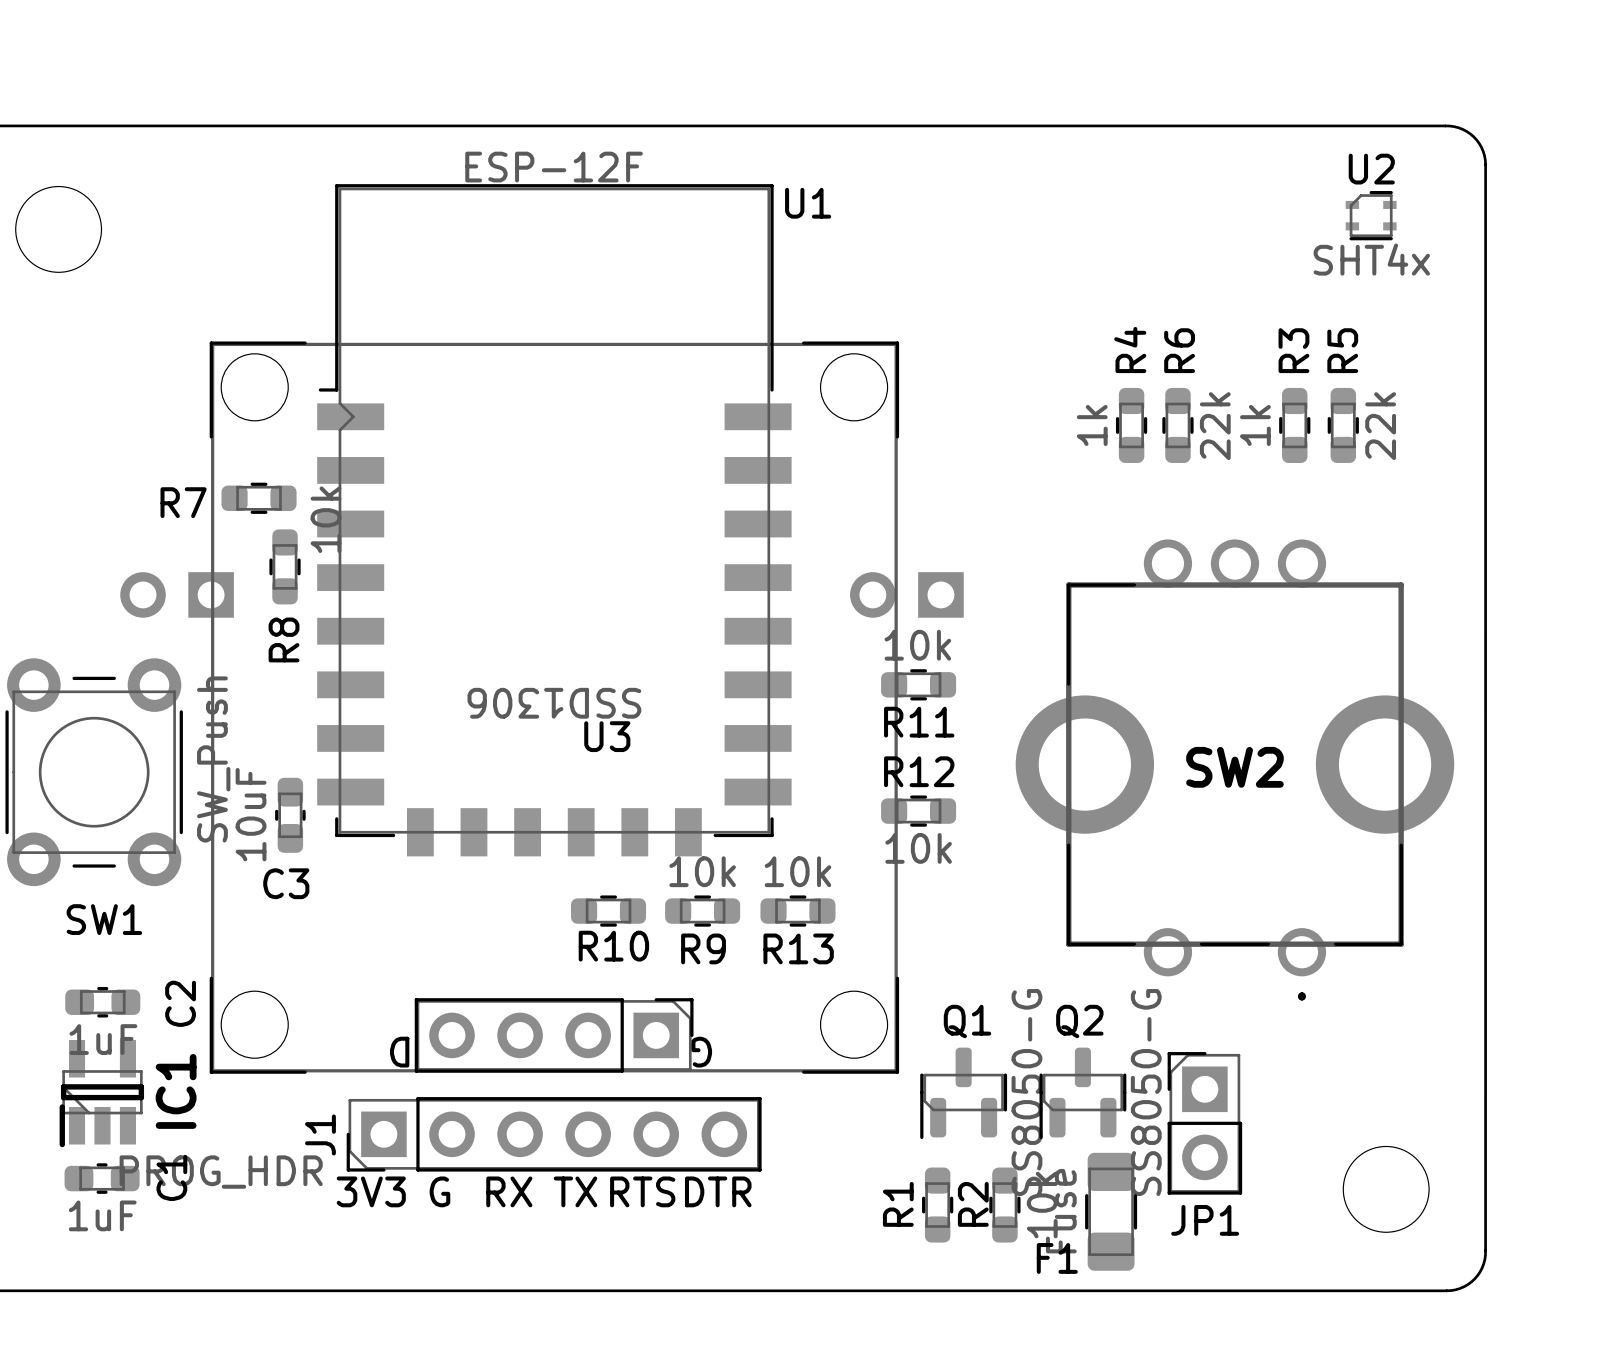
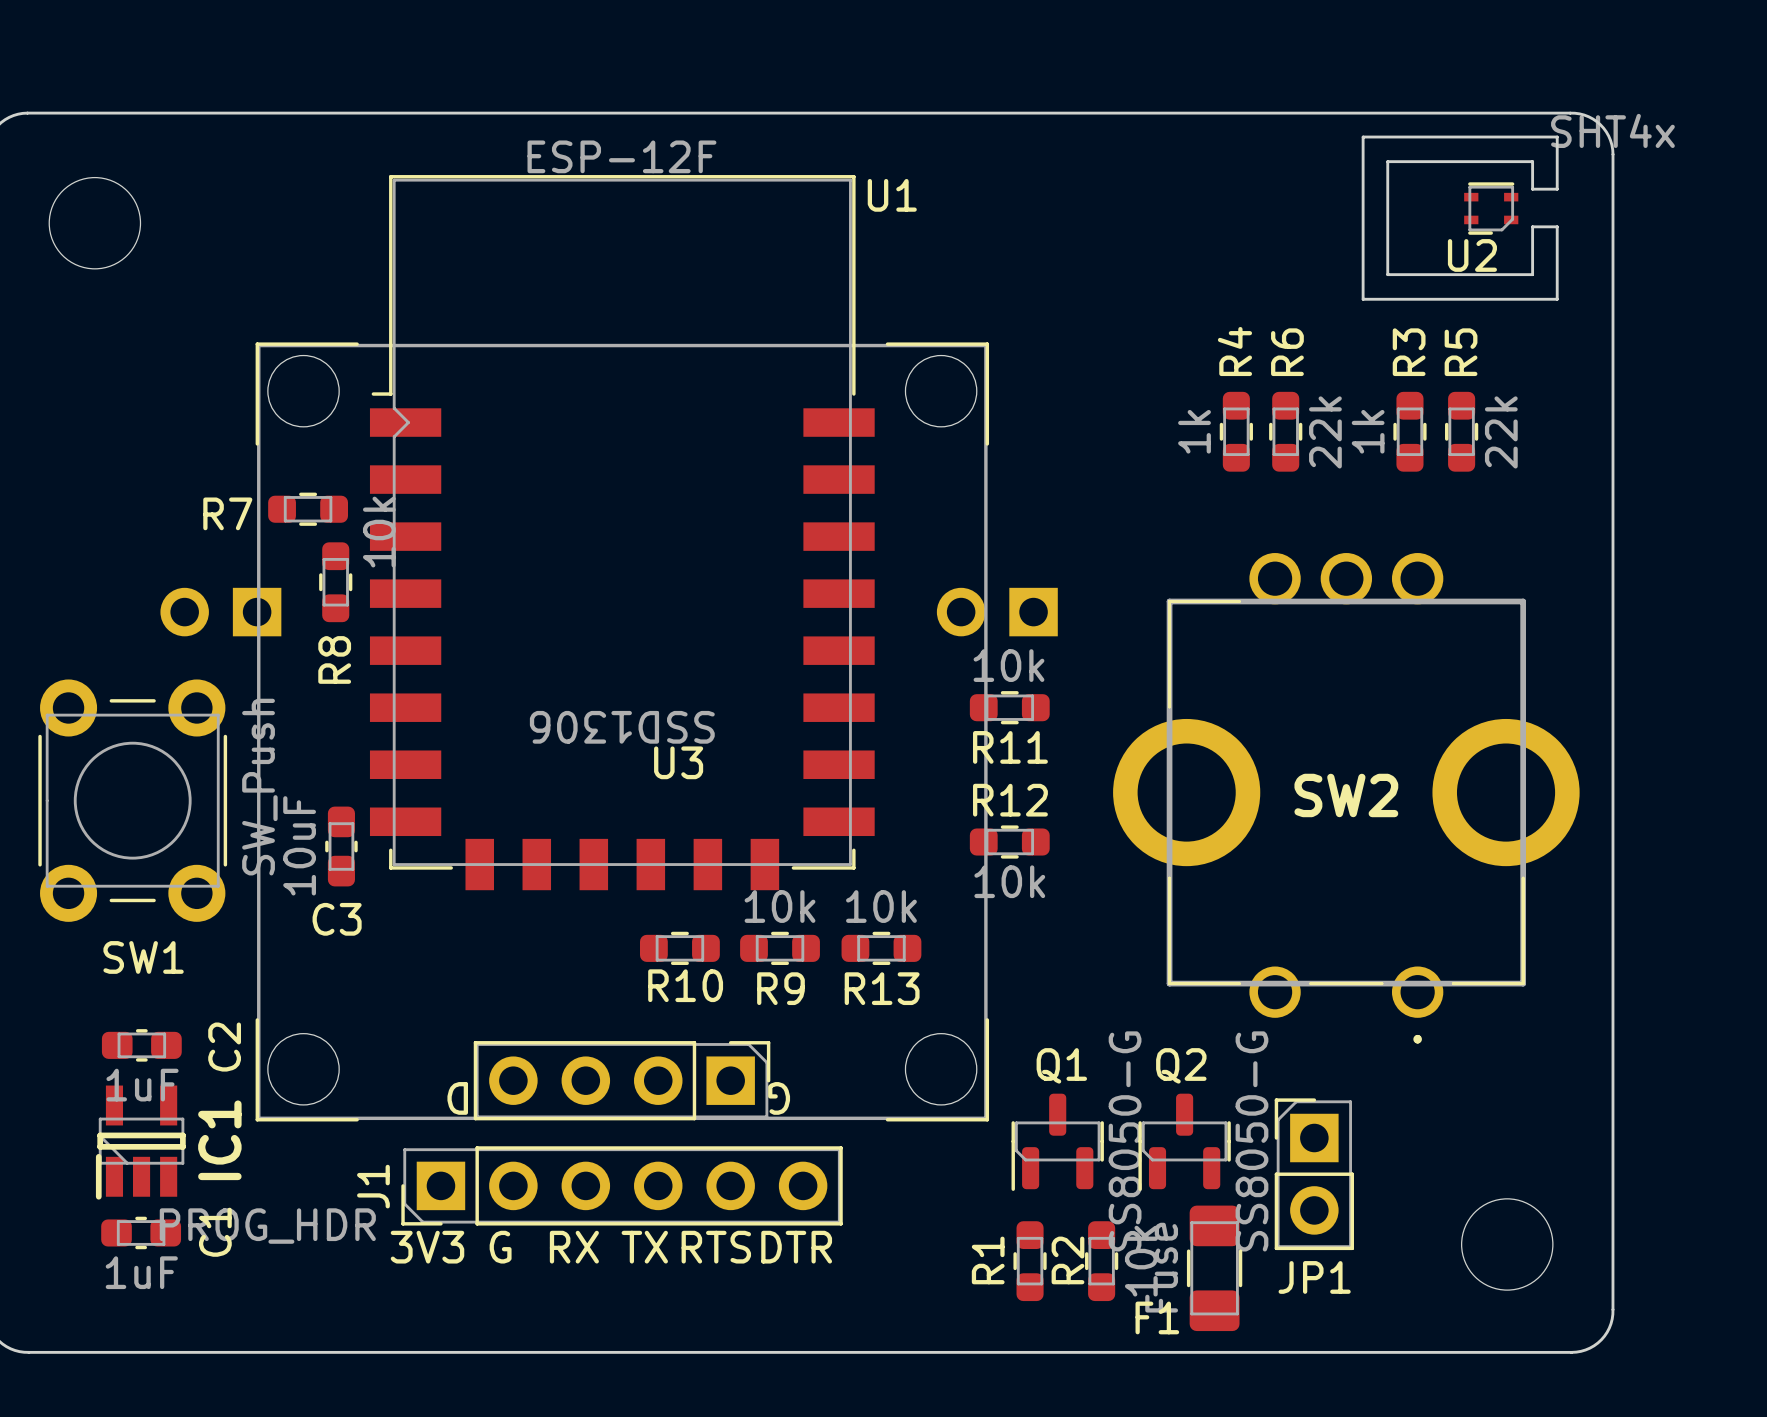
board edge: none -> (1363, 137) (1363, 299) (1557, 299) (1557, 226) (1532, 226) (1532, 274) (1387, 274) (1387, 161) (1532, 161) (1532, 189) (1557, 189) (1557, 137) (1363, 137)
U2 rotation: 0° (1371, 215) -> 180° (1491, 208)
U2 value position: SHT4x (1371, 259) -> SHT4x (1612, 130)

